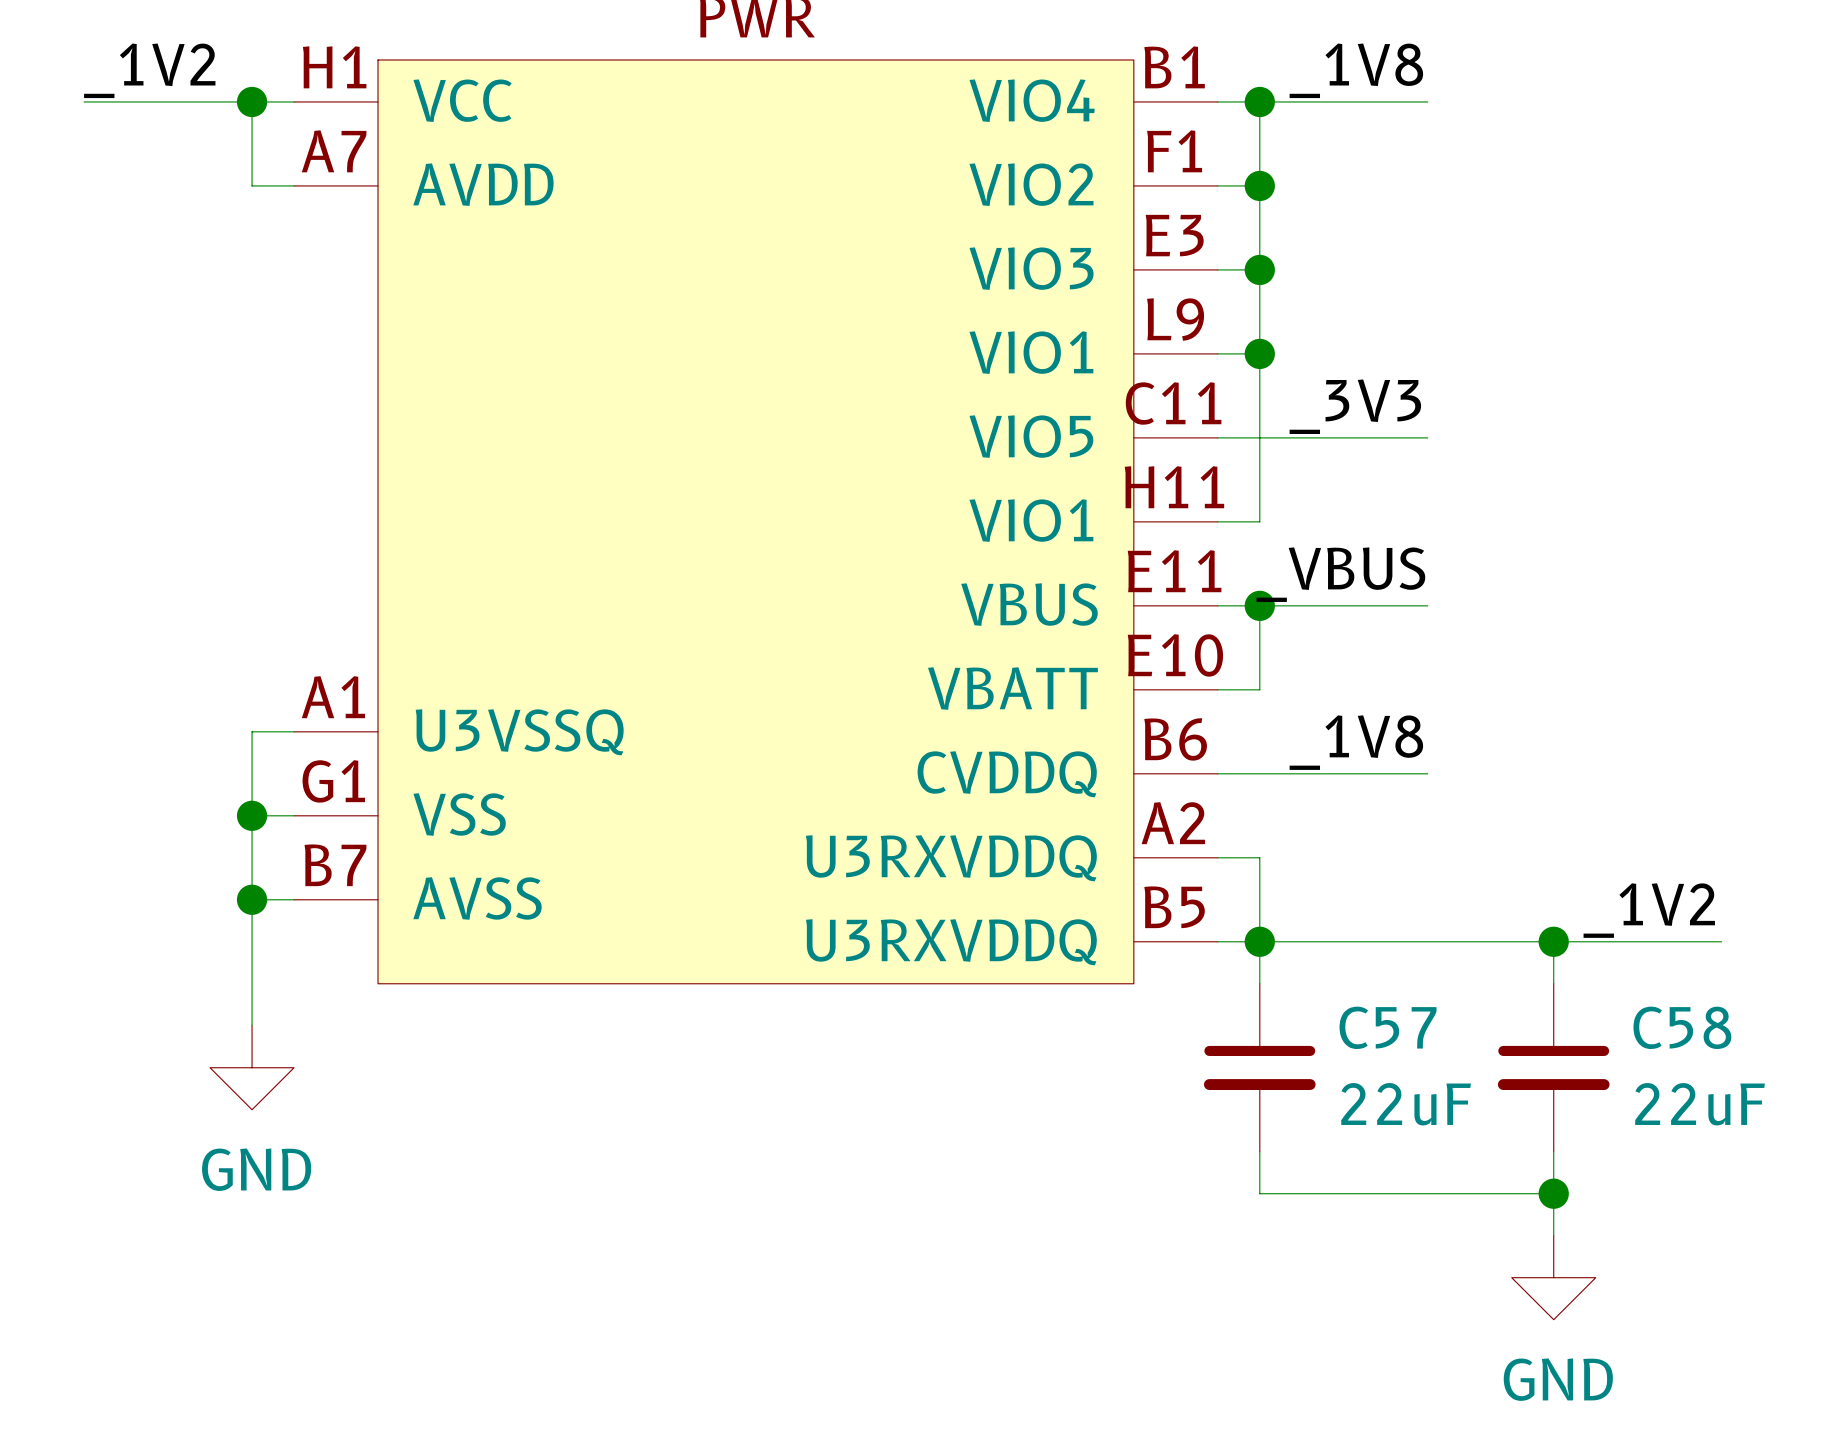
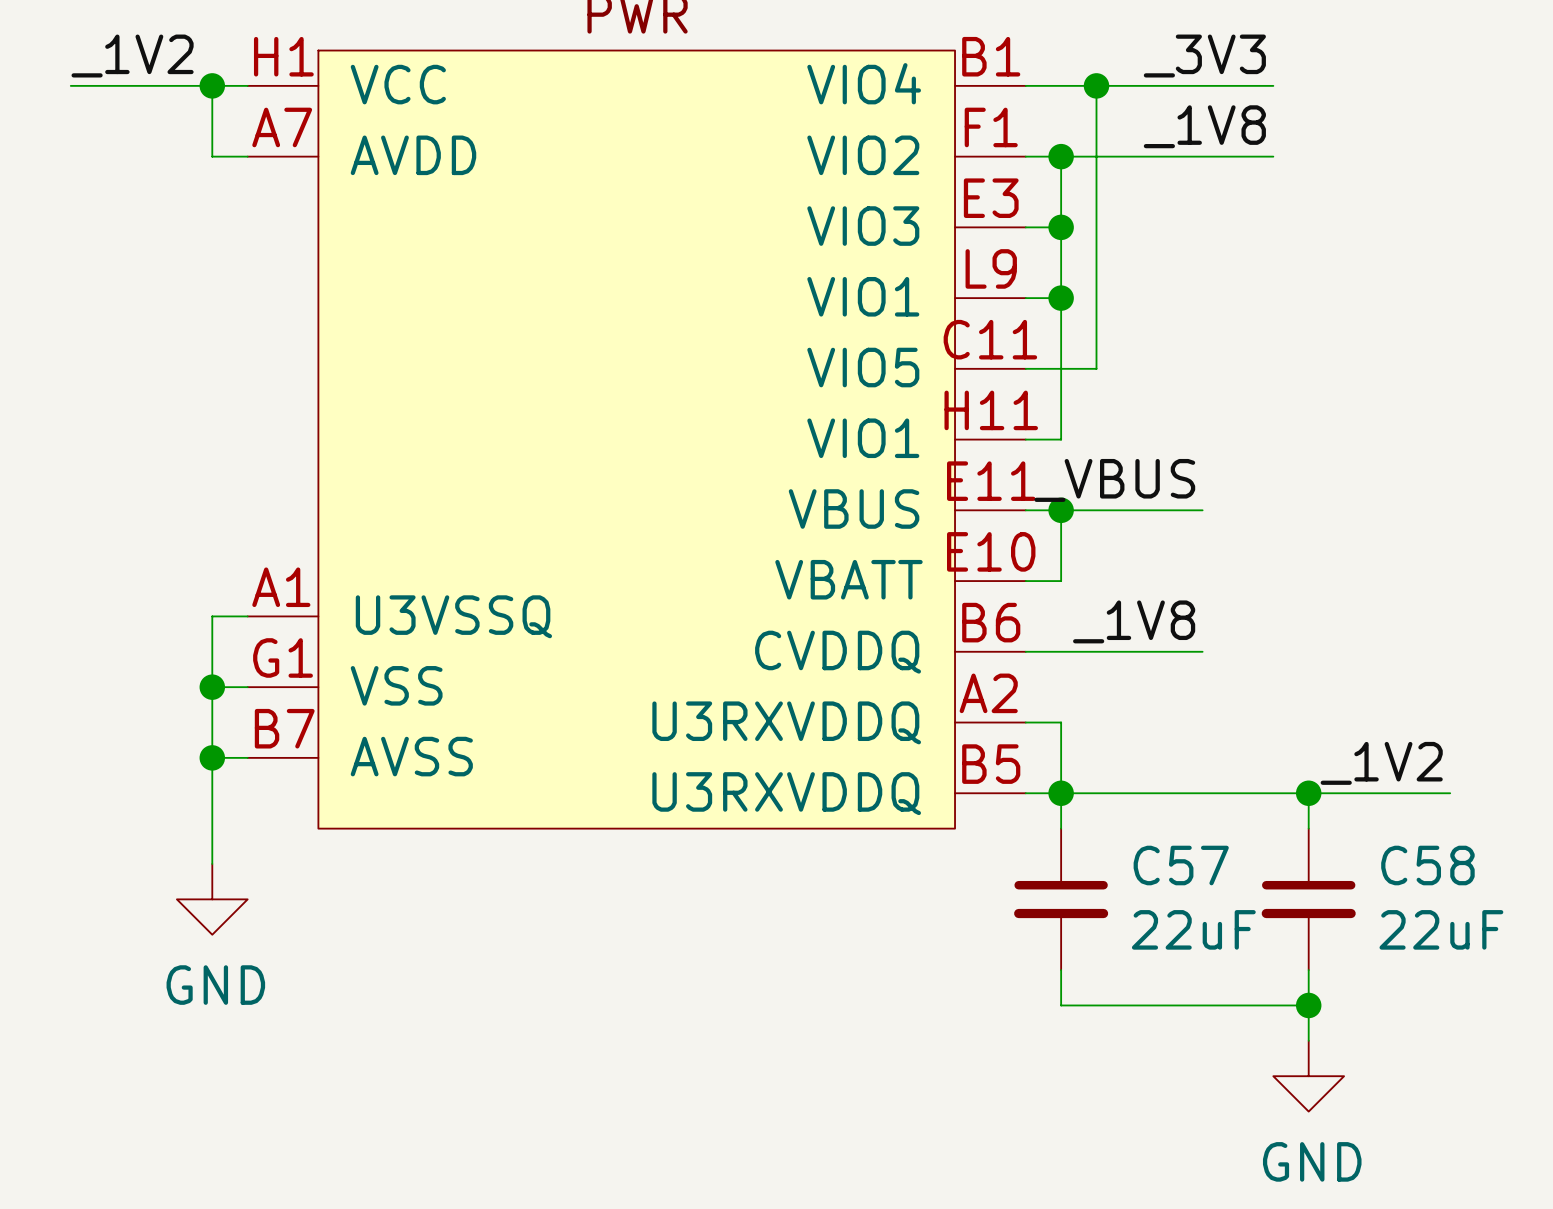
label position: _1V8 (1356, 70) -> _1V8 (1204, 126)
wire: (1259, 101) (1259, 185) -> (1273, 156) (1061, 156)
junction position: (1259, 101) -> (1096, 85)
wire: none -> (1202, 85) (1273, 85)
label position: _3V3 (1355, 406) -> _3V3 (1204, 56)
wire: (1301, 437) (1427, 437) -> (1096, 368) (1096, 85)

